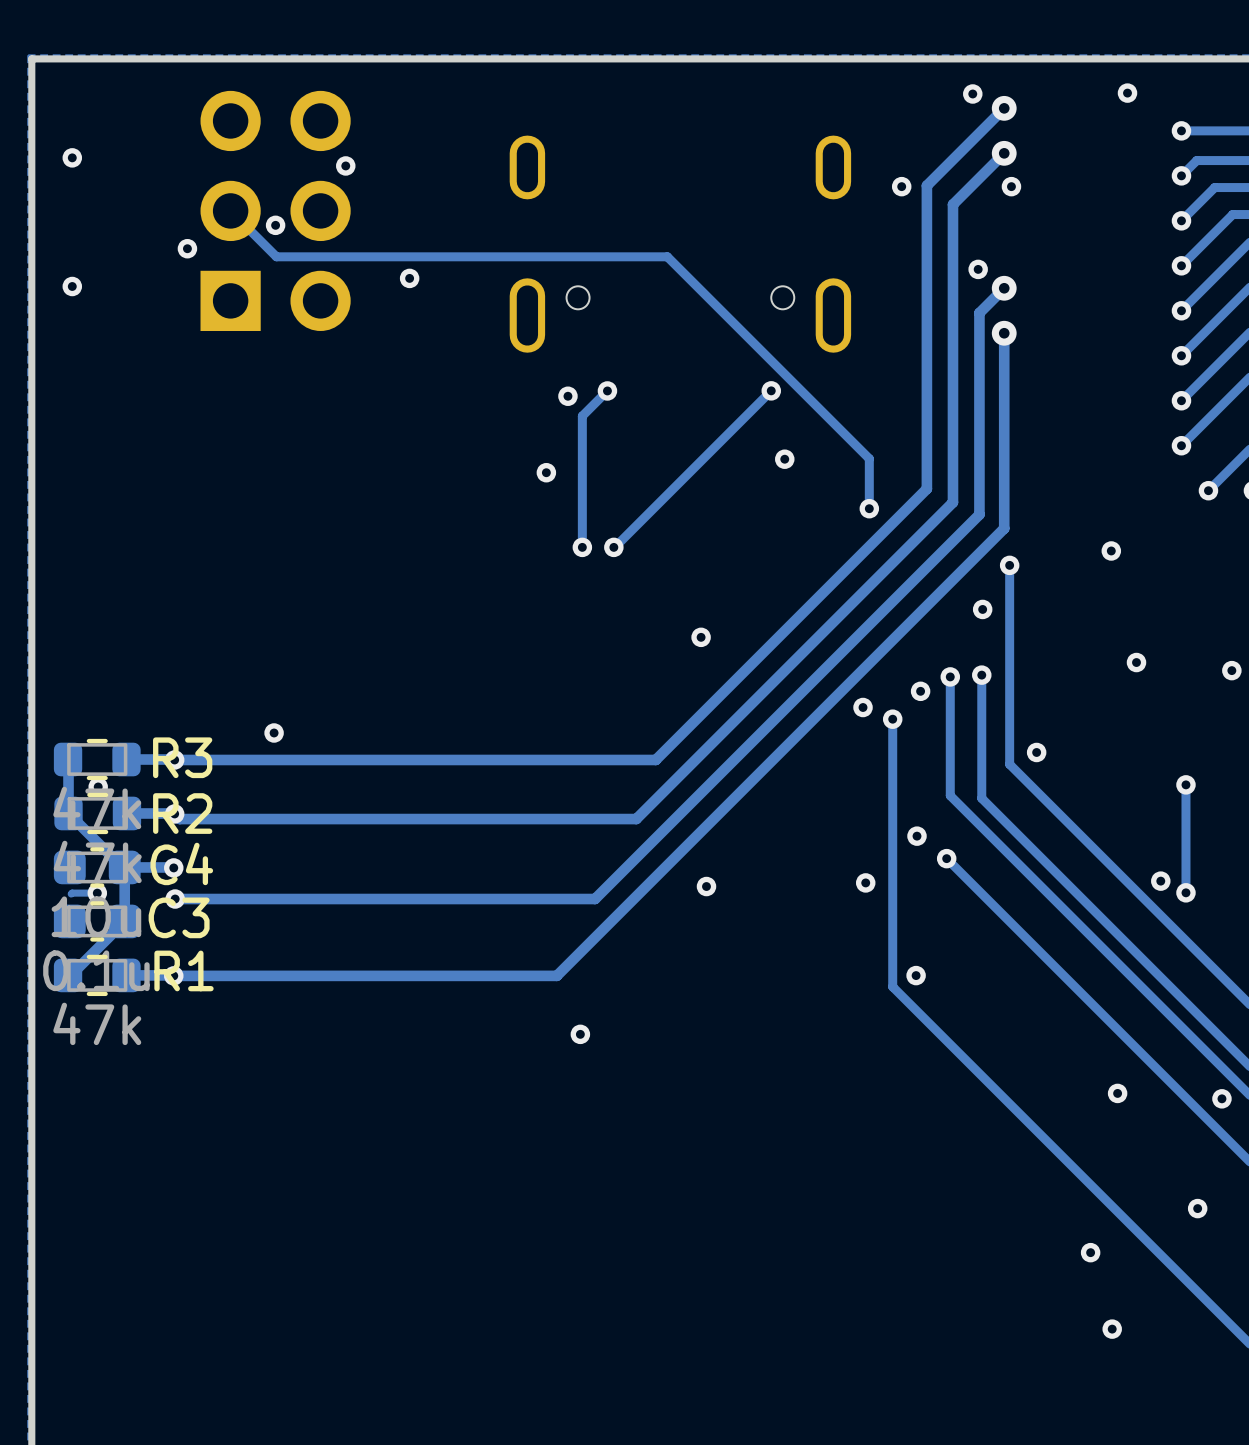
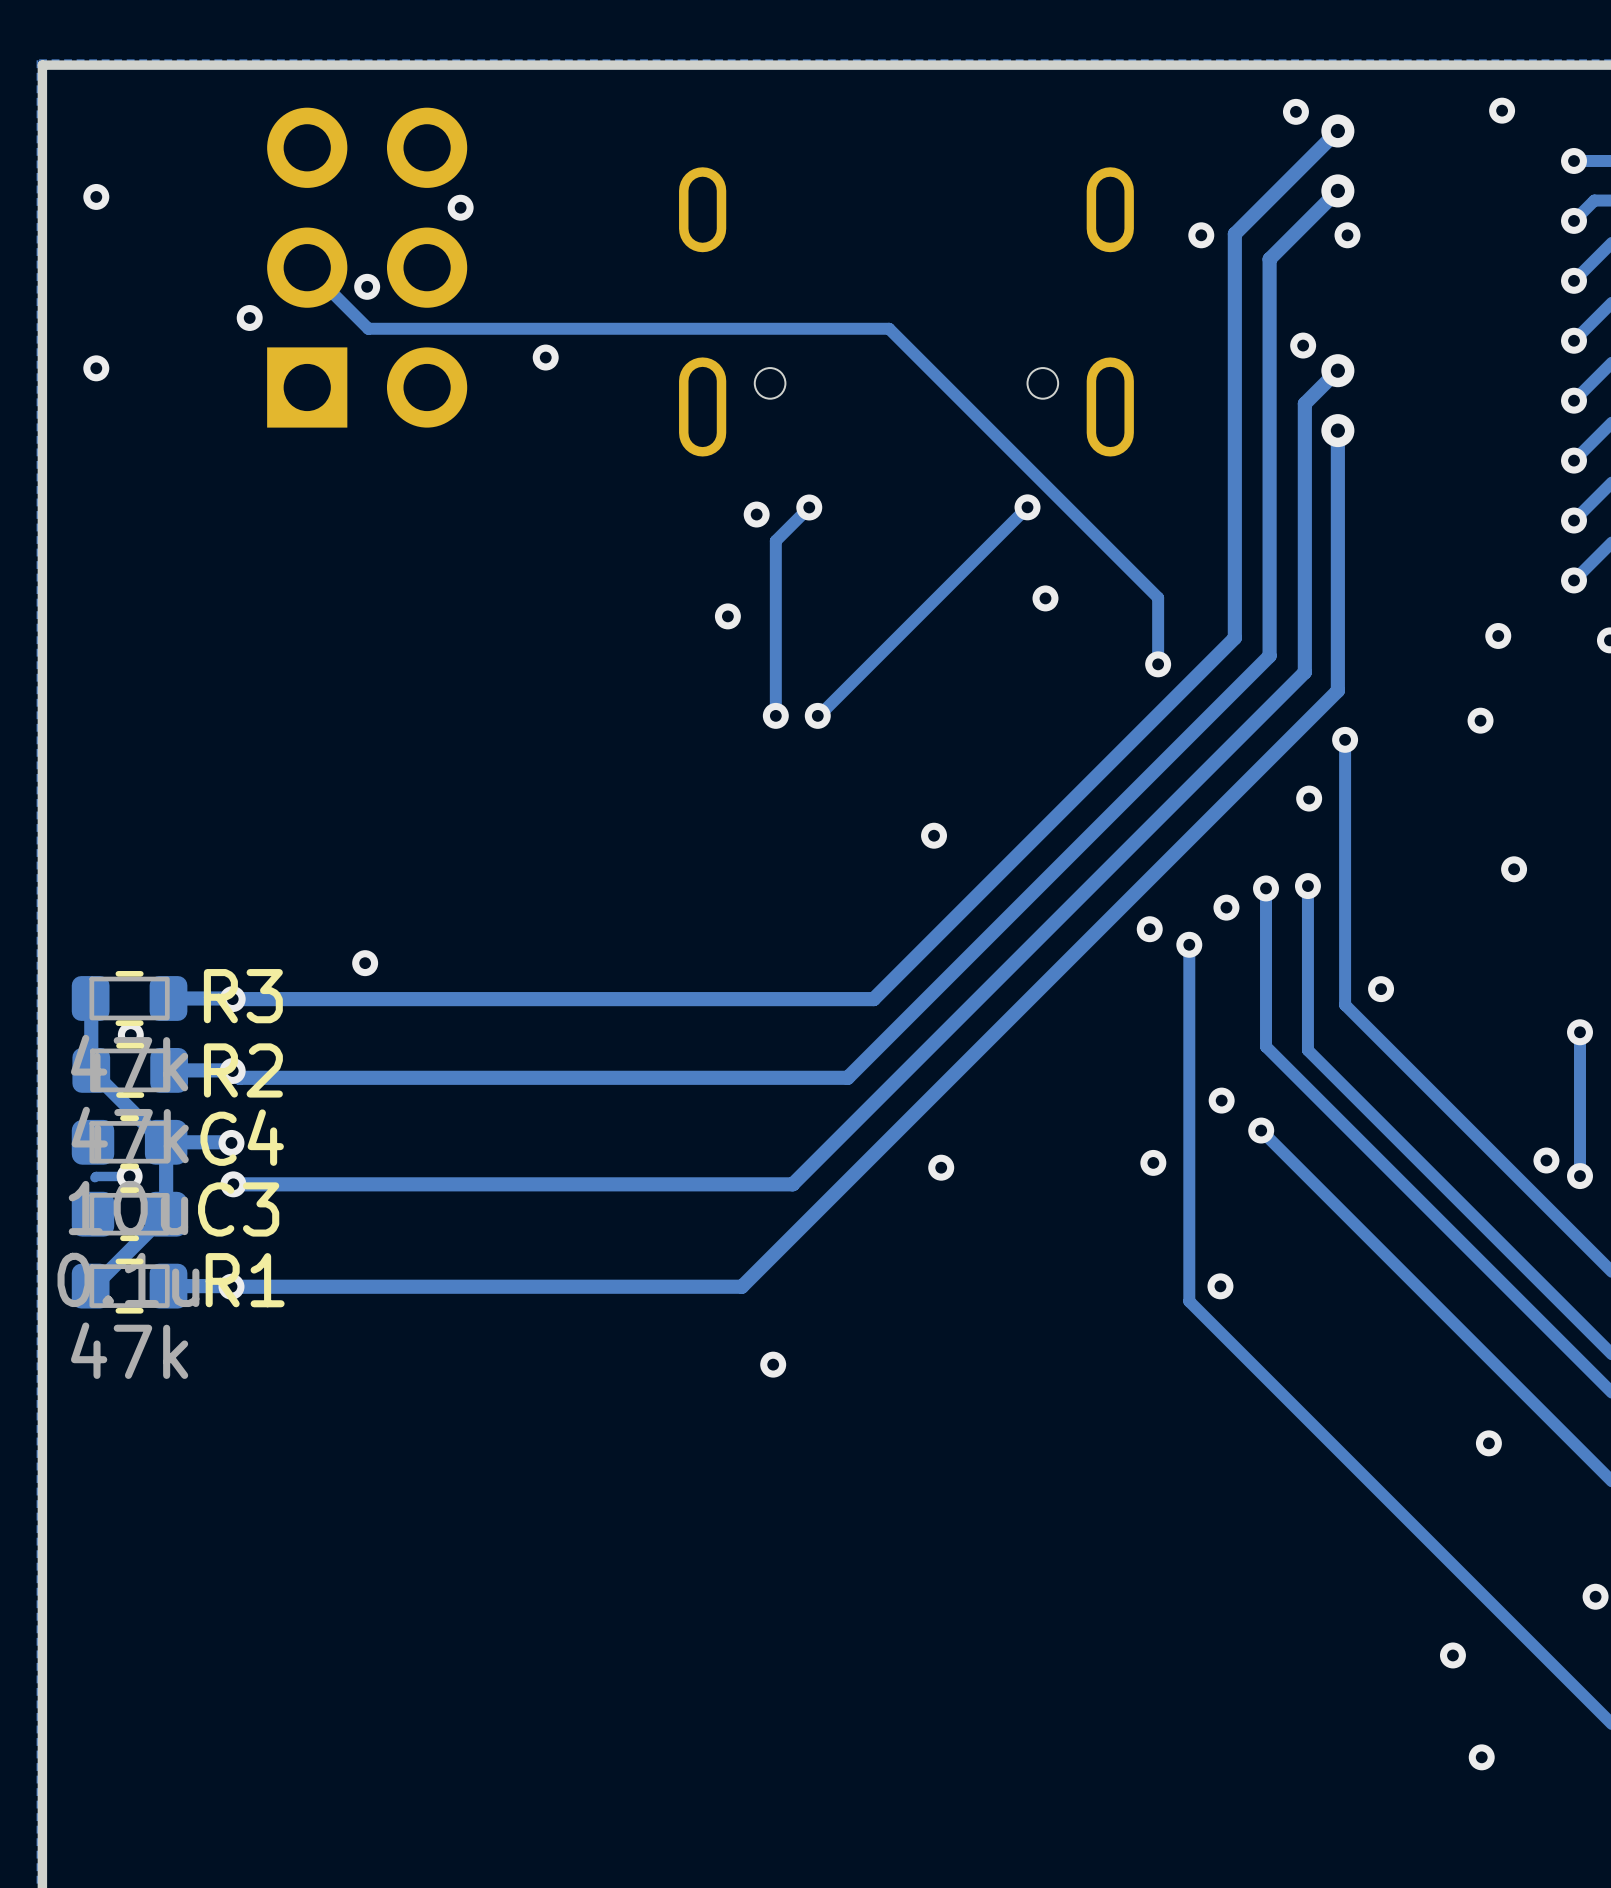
via: none -> (1498, 635)

